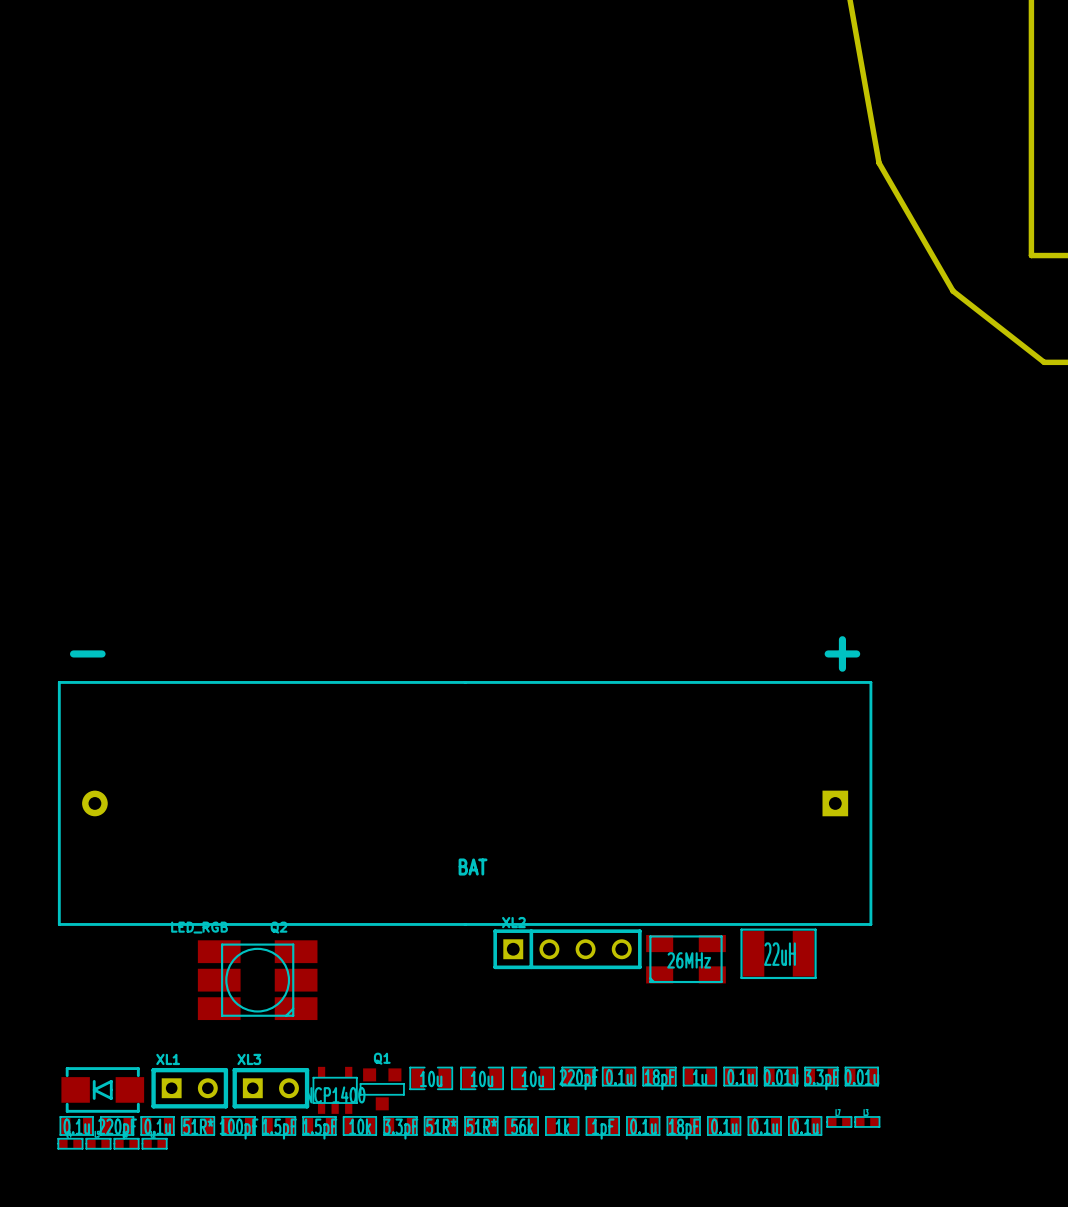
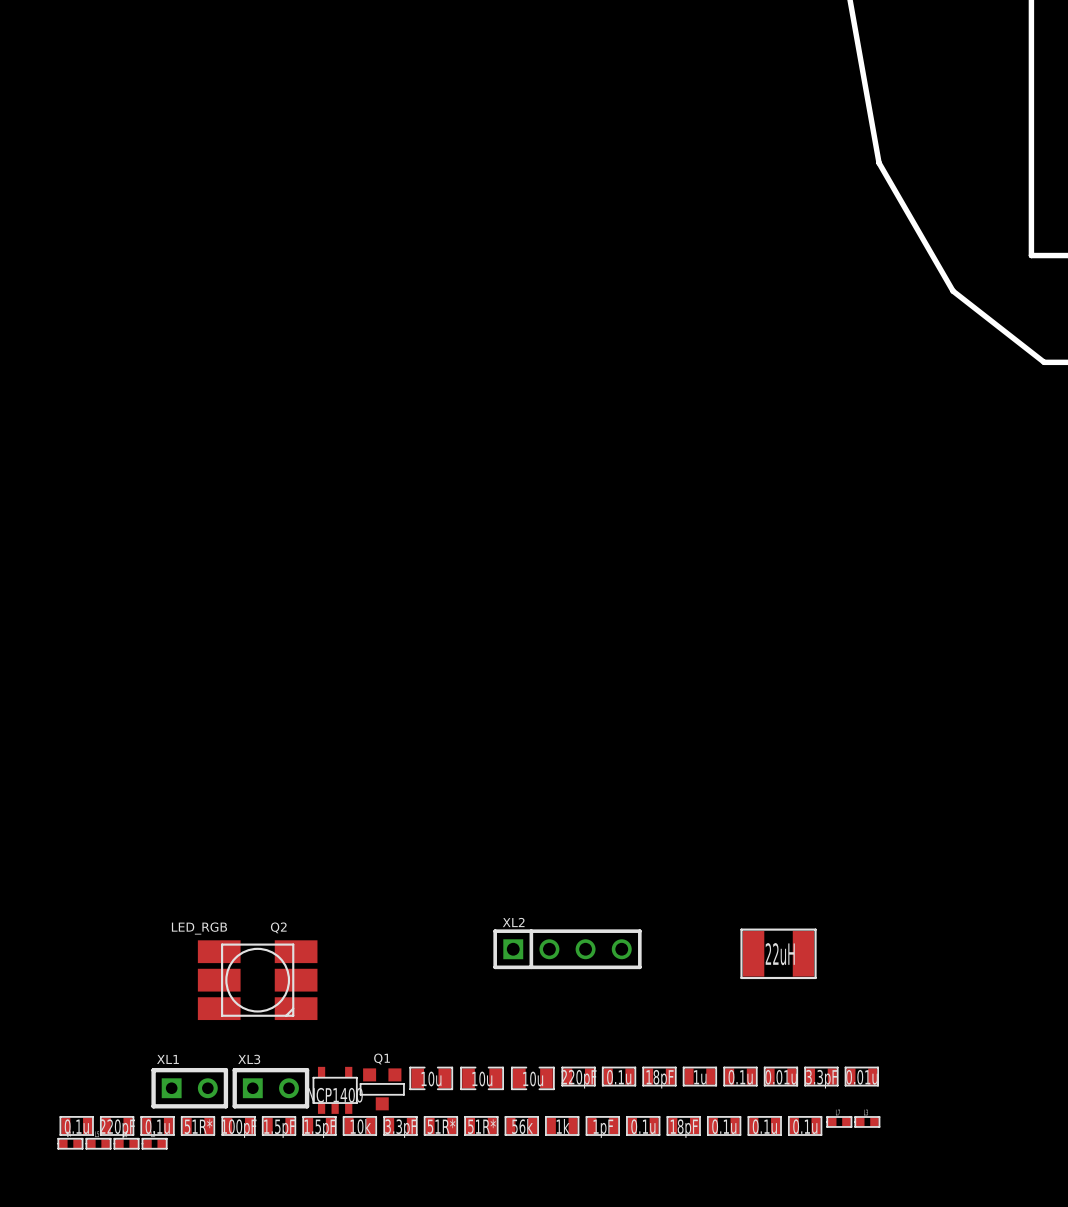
part: BAT (465, 781) -> none
part: 26MHz (685, 959) -> none
part: (102, 1089) -> none

